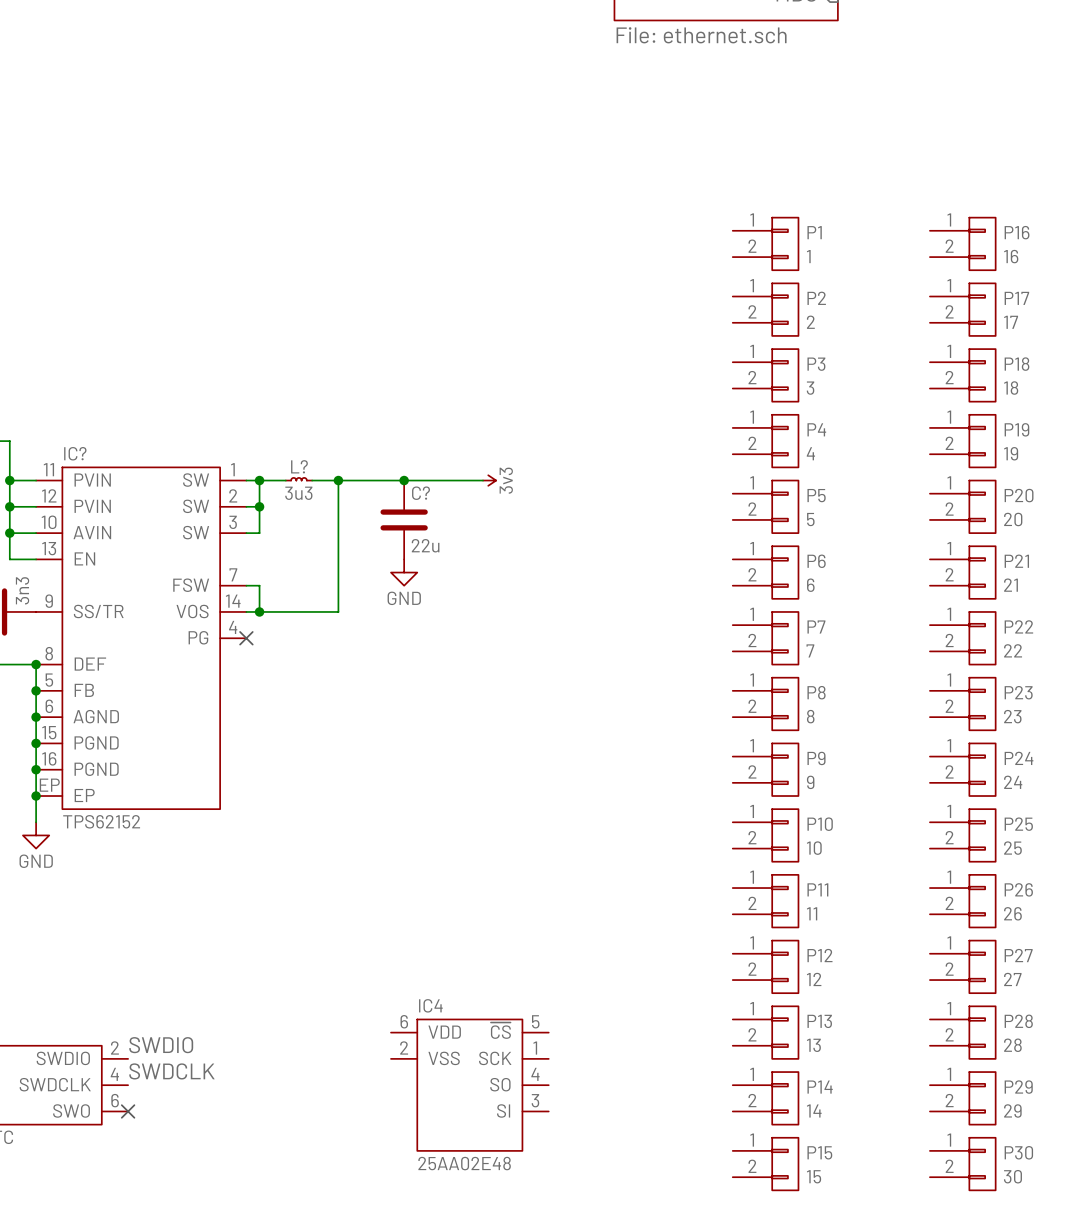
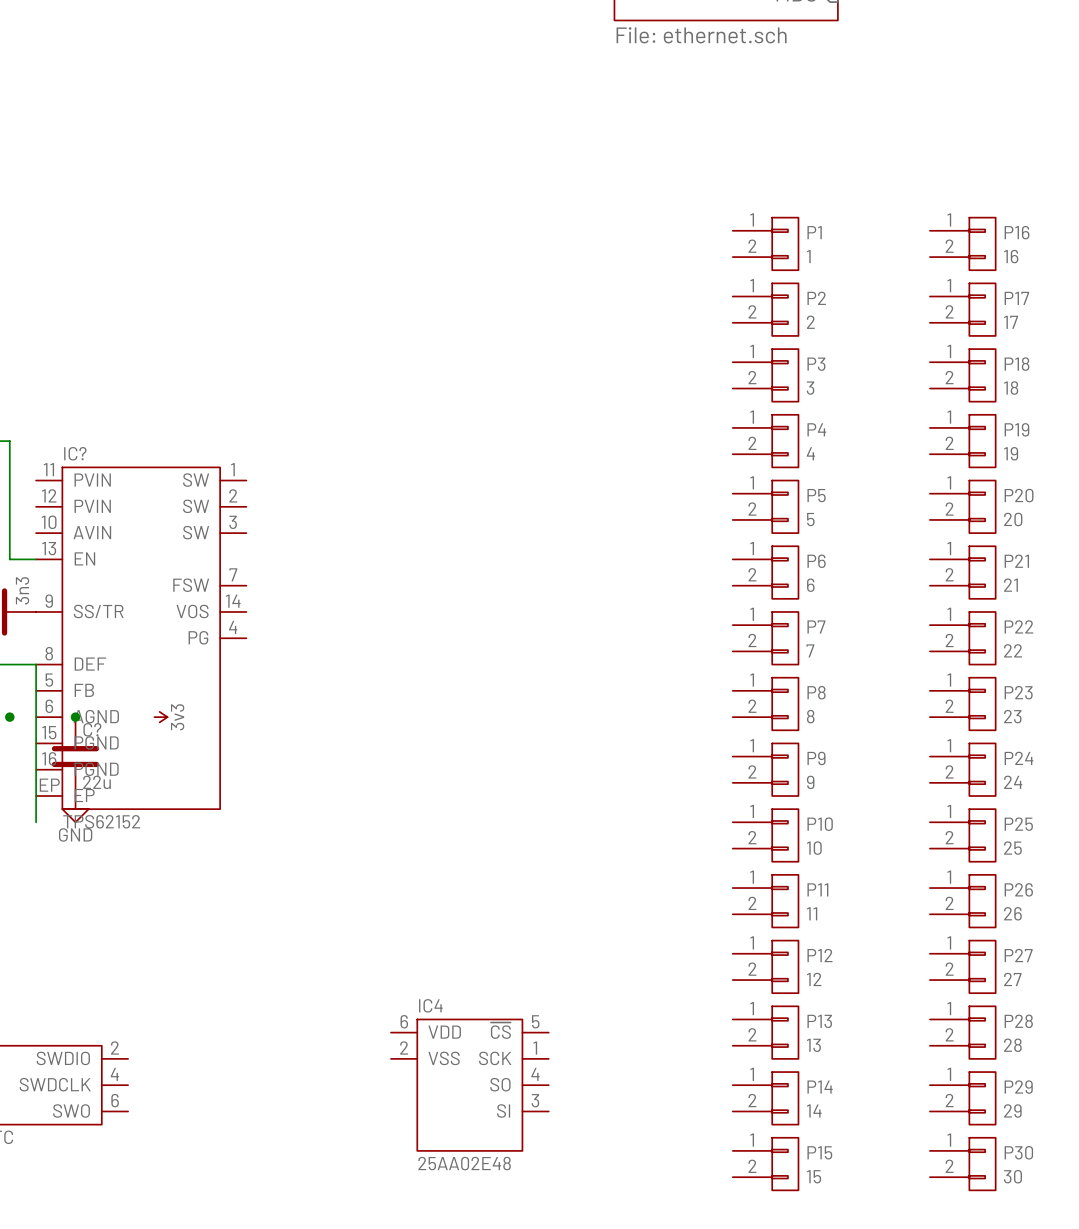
L?: 3u3 (298, 479) -> none
wire: (9, 480) (36, 480) -> none
junction: (9, 480) -> none
wire: (246, 480) (285, 480) -> none
wire: (259, 480) (259, 533) (246, 533) -> none
junction: (259, 480) -> none
wire: (312, 480) (483, 480) -> none
wire: (338, 480) (338, 611) (246, 611) -> none
junction: (338, 480) -> none
junction: (404, 480) -> none
power symbol: 3v3 (489, 480) -> none
wire: (9, 506) (36, 506) -> none
junction: (9, 506) -> none
wire: (246, 506) (259, 506) -> none
junction: (259, 506) -> none
C?: 22u (404, 519) -> none
wire: (9, 533) (36, 533) -> none
junction: (9, 533) -> none
power symbol: GND (404, 572) -> none
wire: (246, 585) (259, 585) (259, 611) -> none
junction: (259, 611) -> none
no-connect mark: (246, 638) -> none
junction: (36, 664) -> none
junction: (36, 690) -> none
junction: none -> (9, 717)
junction: (36, 717) -> none
junction: none -> (75, 717)
power symbol: none -> 3v3 (160, 717)
junction: (36, 743) -> none
C?: none -> 22u (75, 756)
junction: (36, 769) -> none
junction: (36, 796) -> none
power symbol position: GND (36, 835) -> GND (75, 809)
label: SWDIO (161, 1045) -> none
label: SWDCLK (171, 1071) -> none
no-connect mark: (128, 1111) -> none

